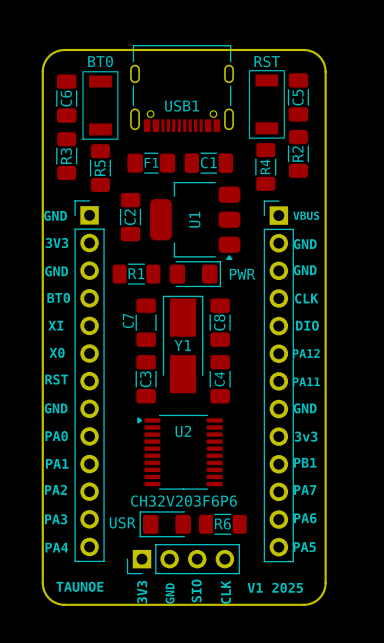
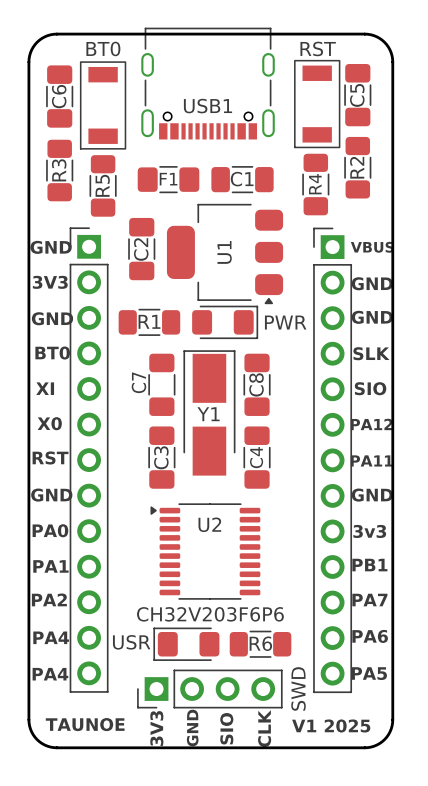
text: CLK (306, 298) -> SLK (371, 353)
text: DIO (307, 325) -> SIO (370, 388)
text: PA3 (56, 519) -> PA4 (51, 637)
part value: none -> SWD (298, 688)

